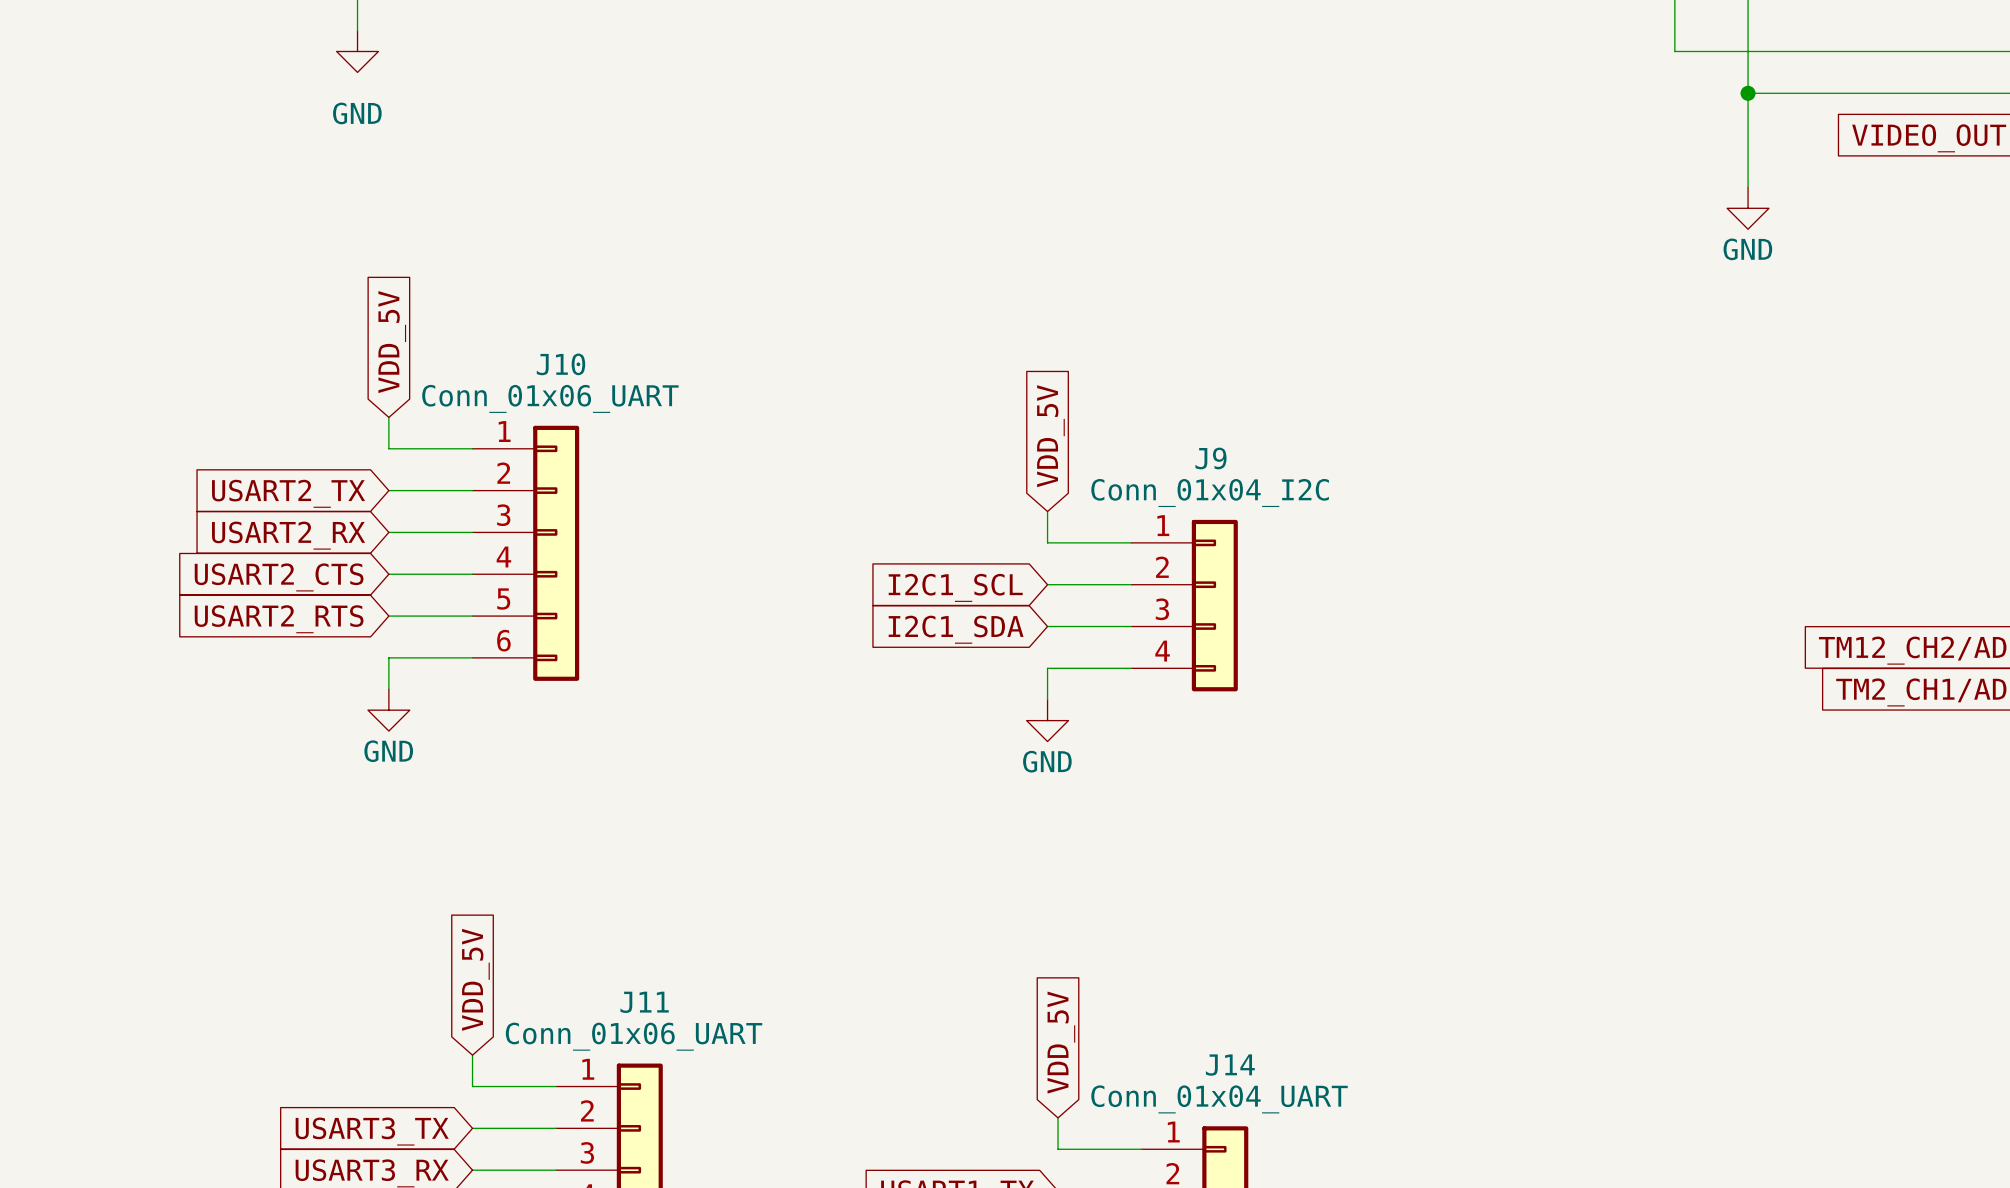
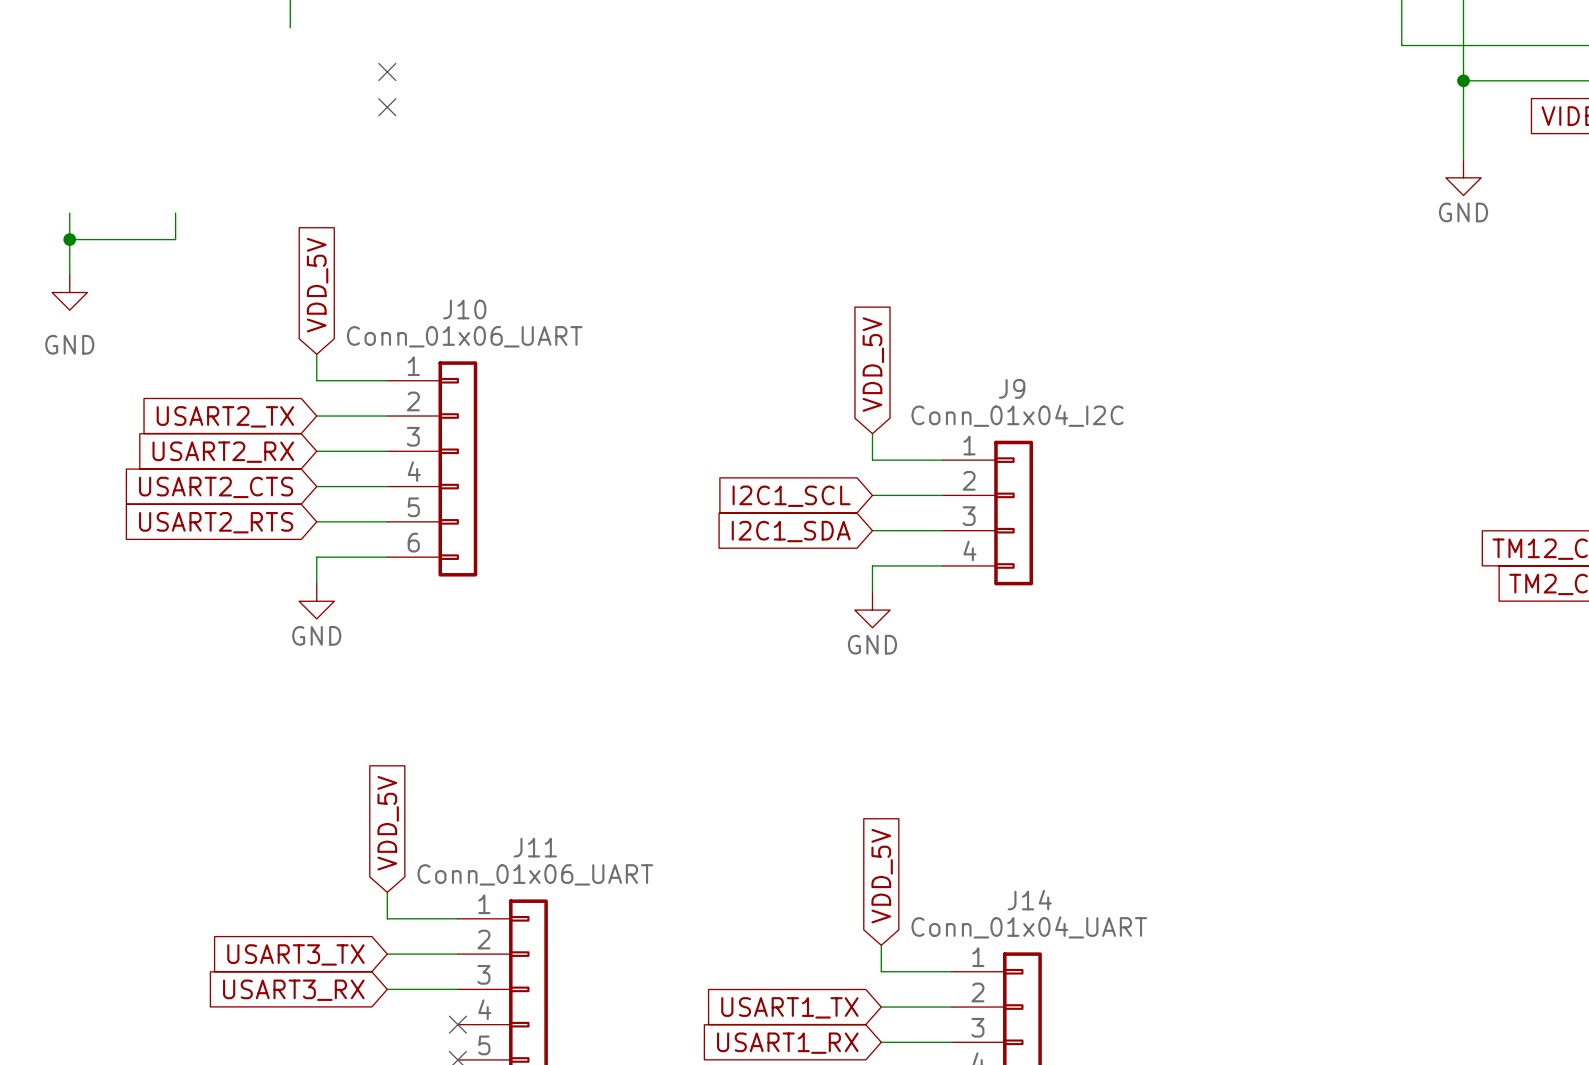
power symbol: GND (357, 51) -> none
no-connect mark: none -> (387, 71)
no-connect mark: none -> (387, 107)
wire: none -> (69, 213) (69, 274)
wire: none -> (175, 213) (175, 239) (69, 239)
junction: none -> (69, 239)
power symbol: none -> GND (69, 292)

